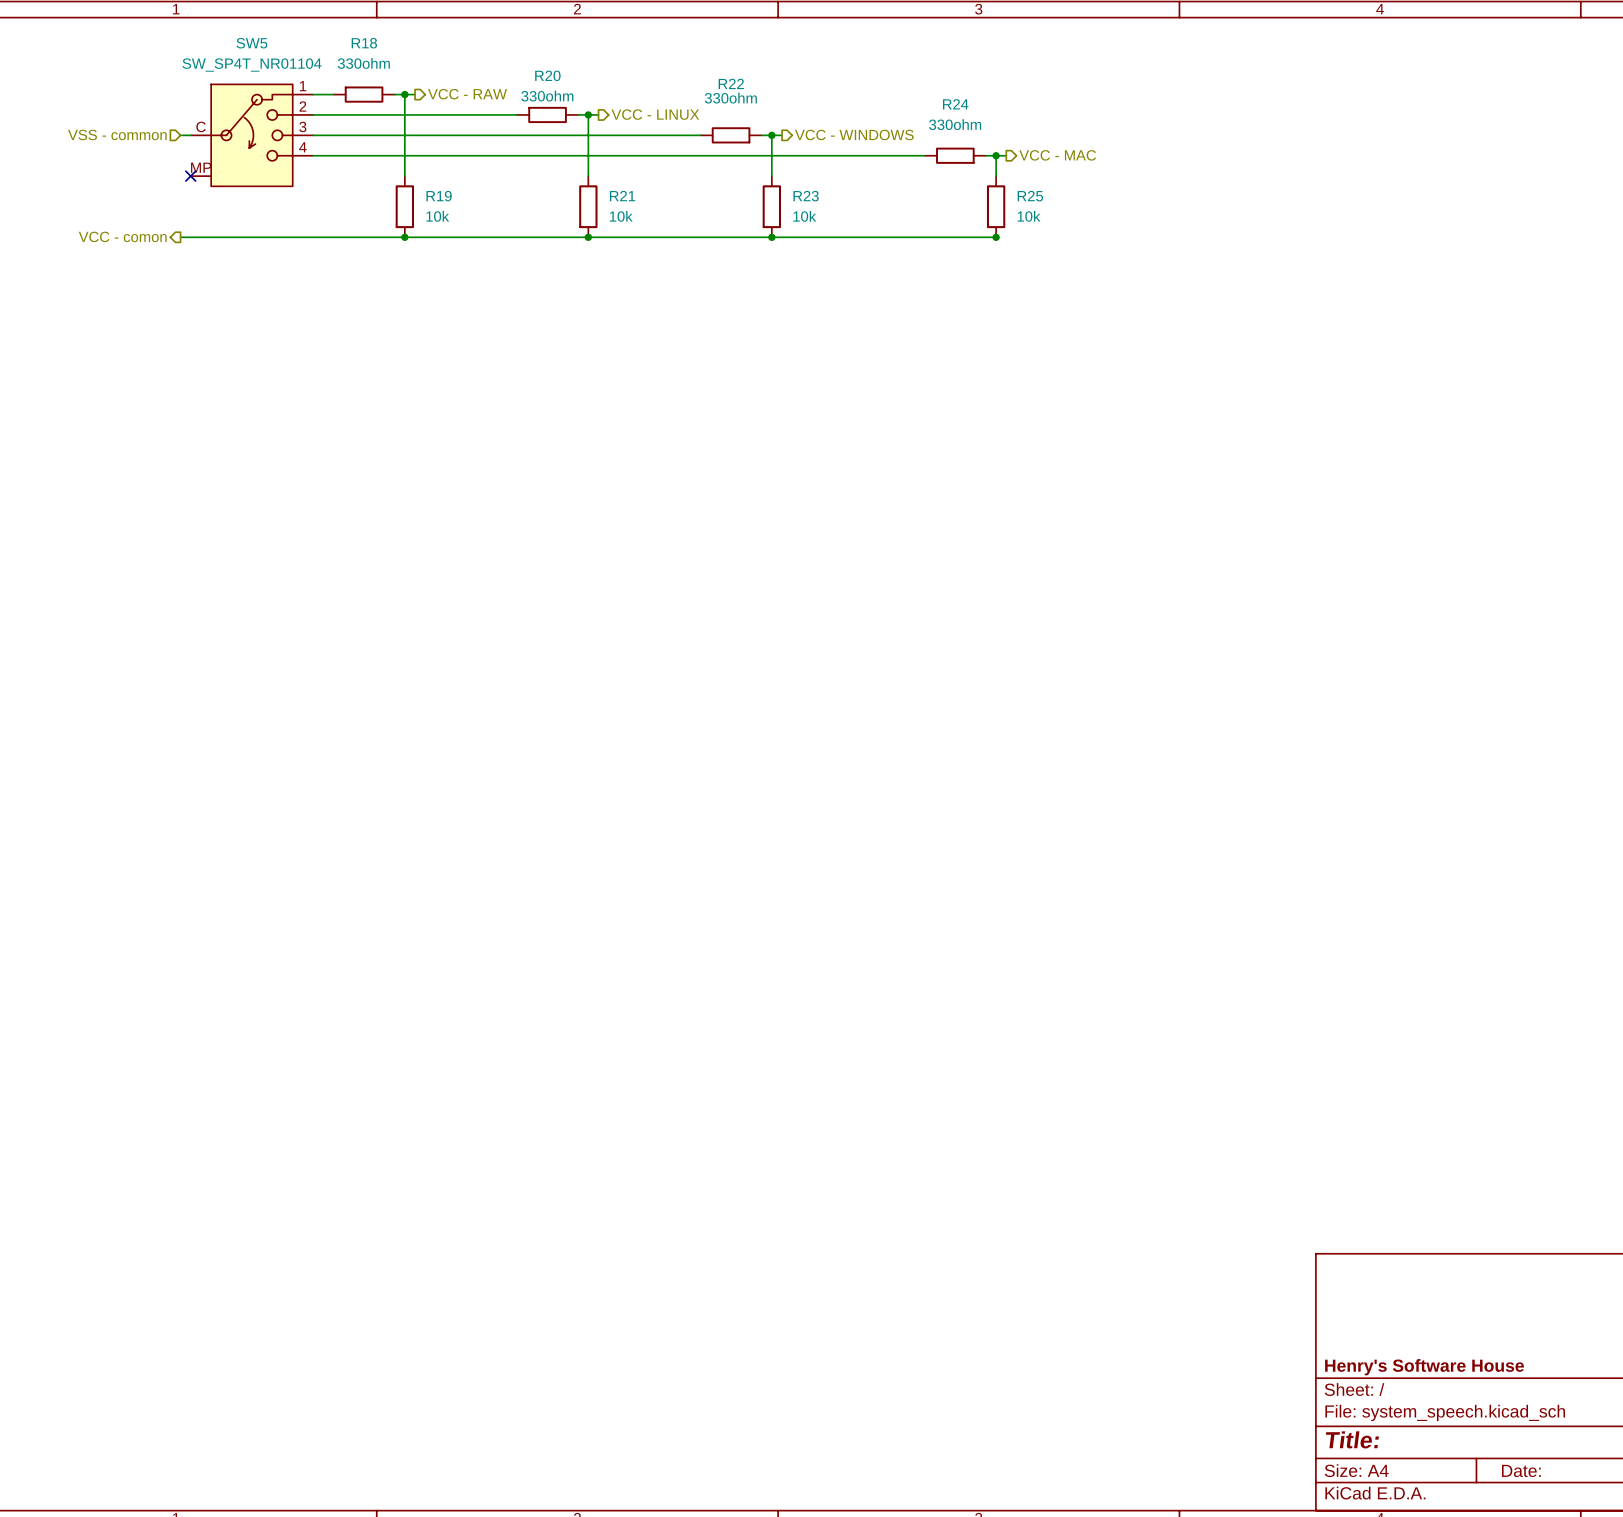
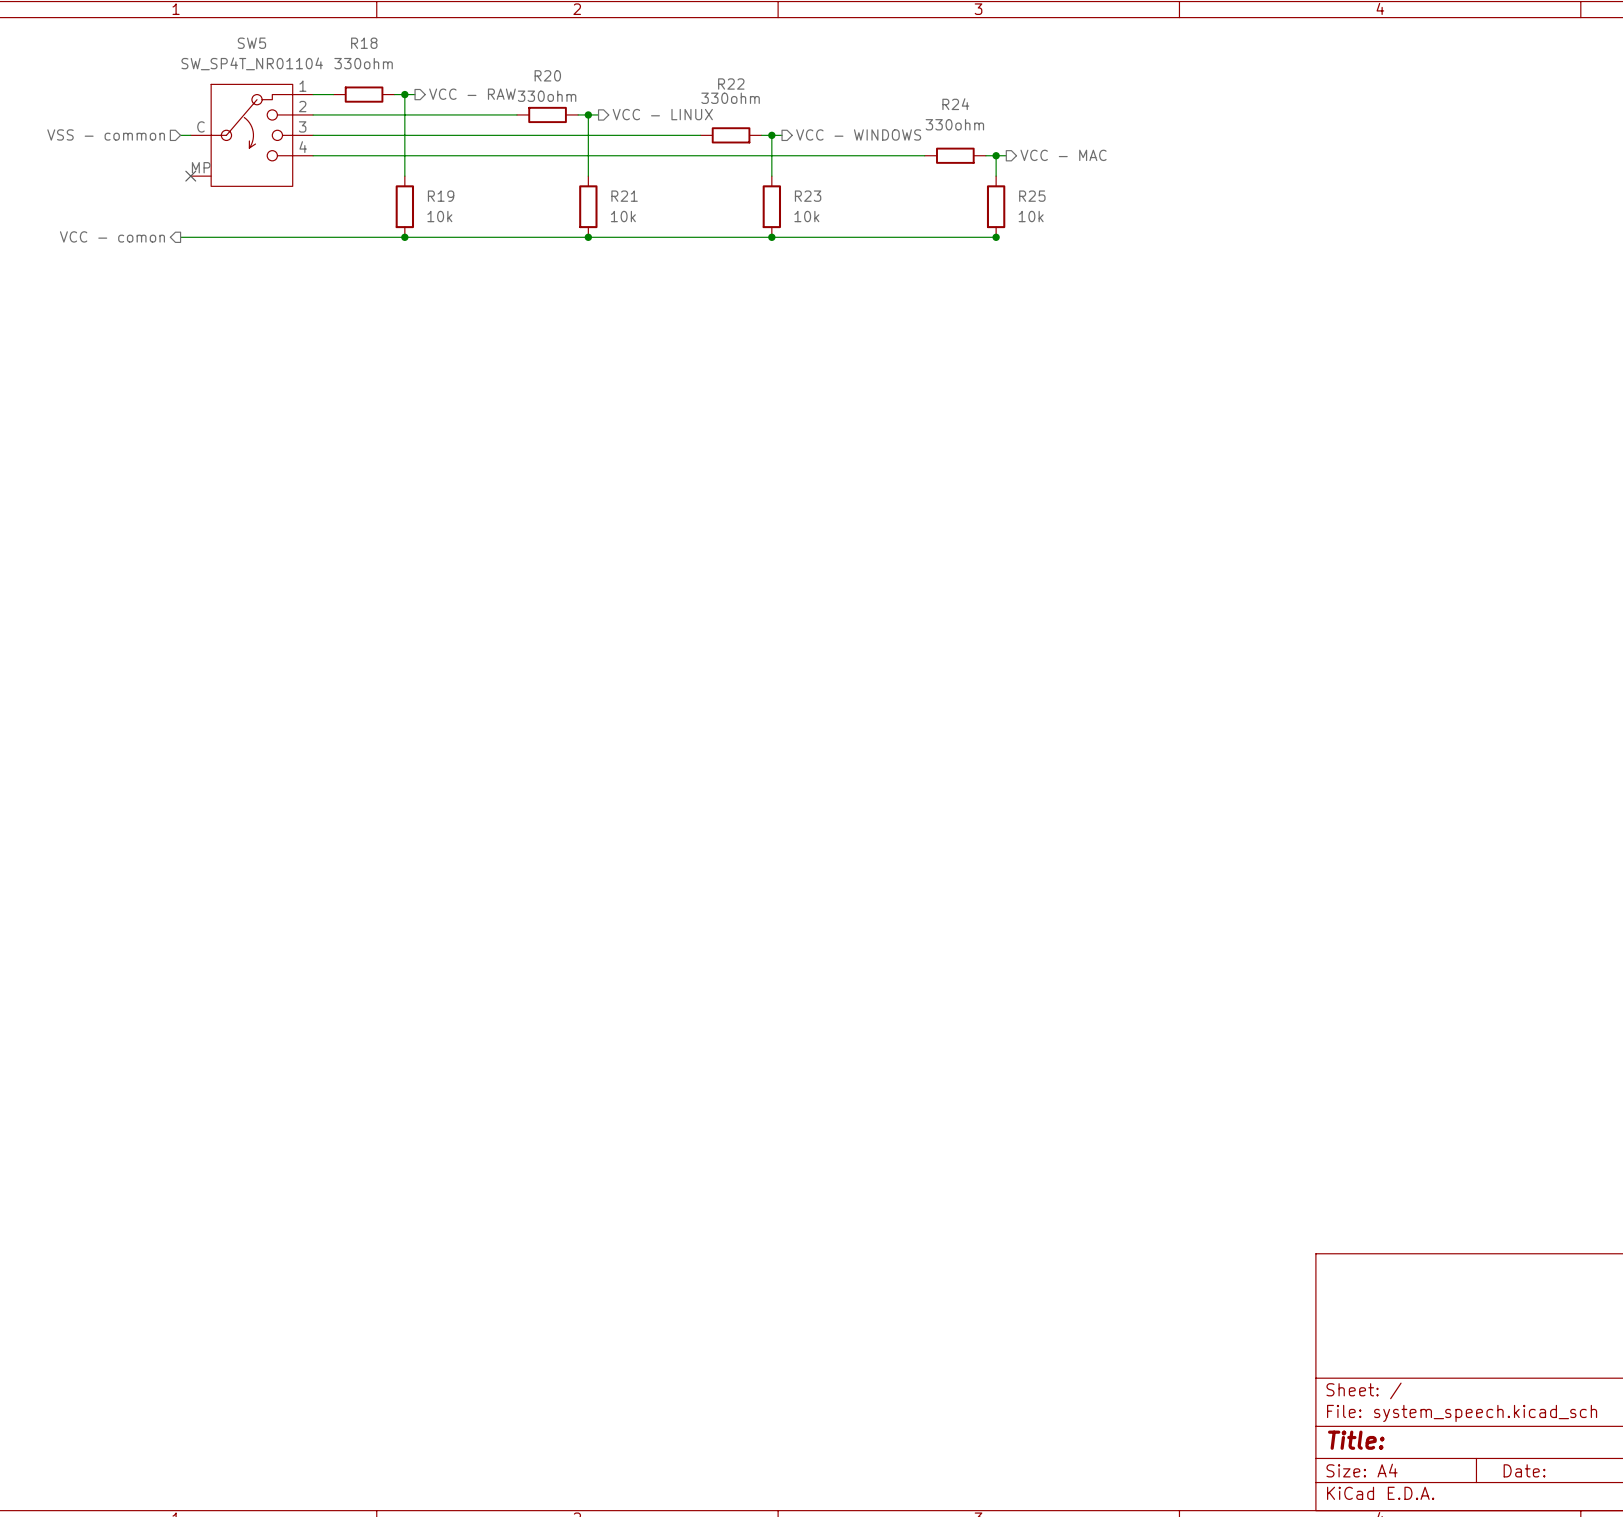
title block: Henry's Software House (1424, 1367) -> none

